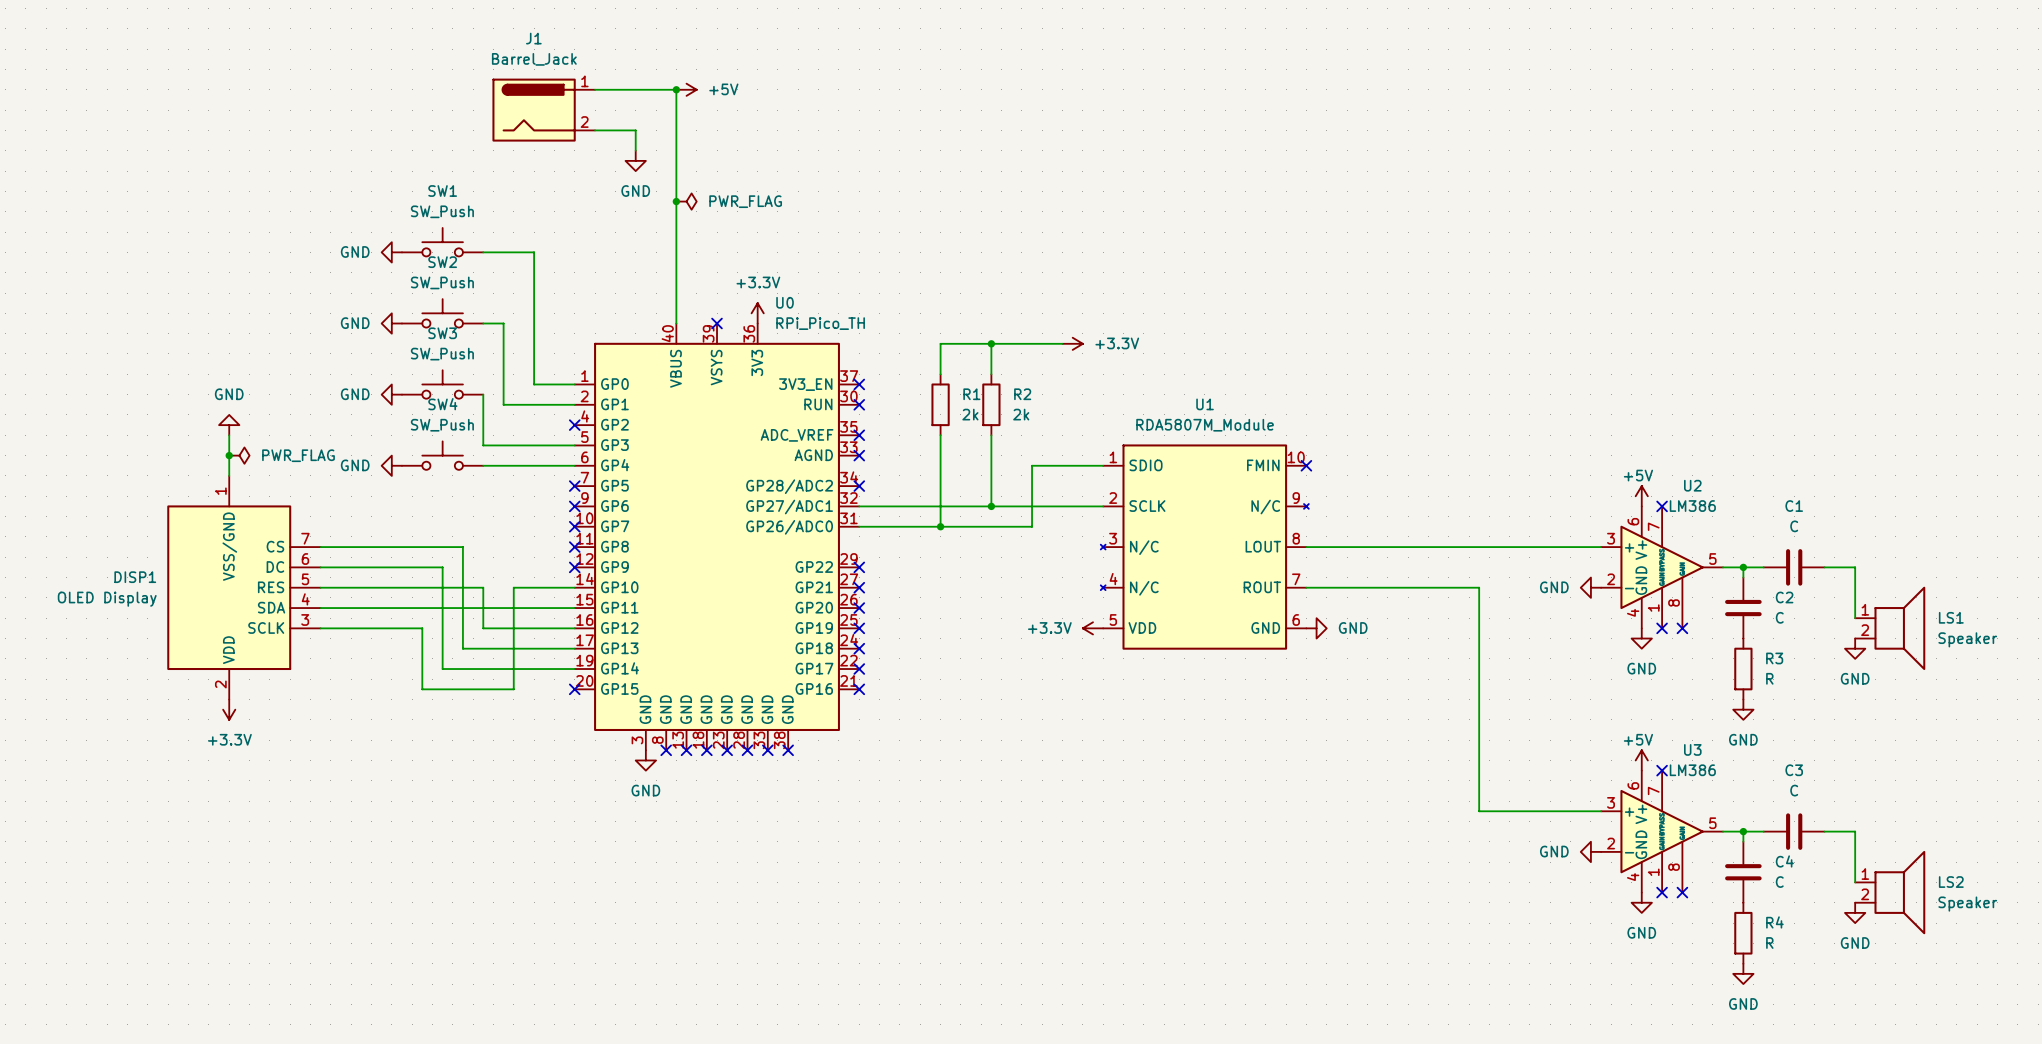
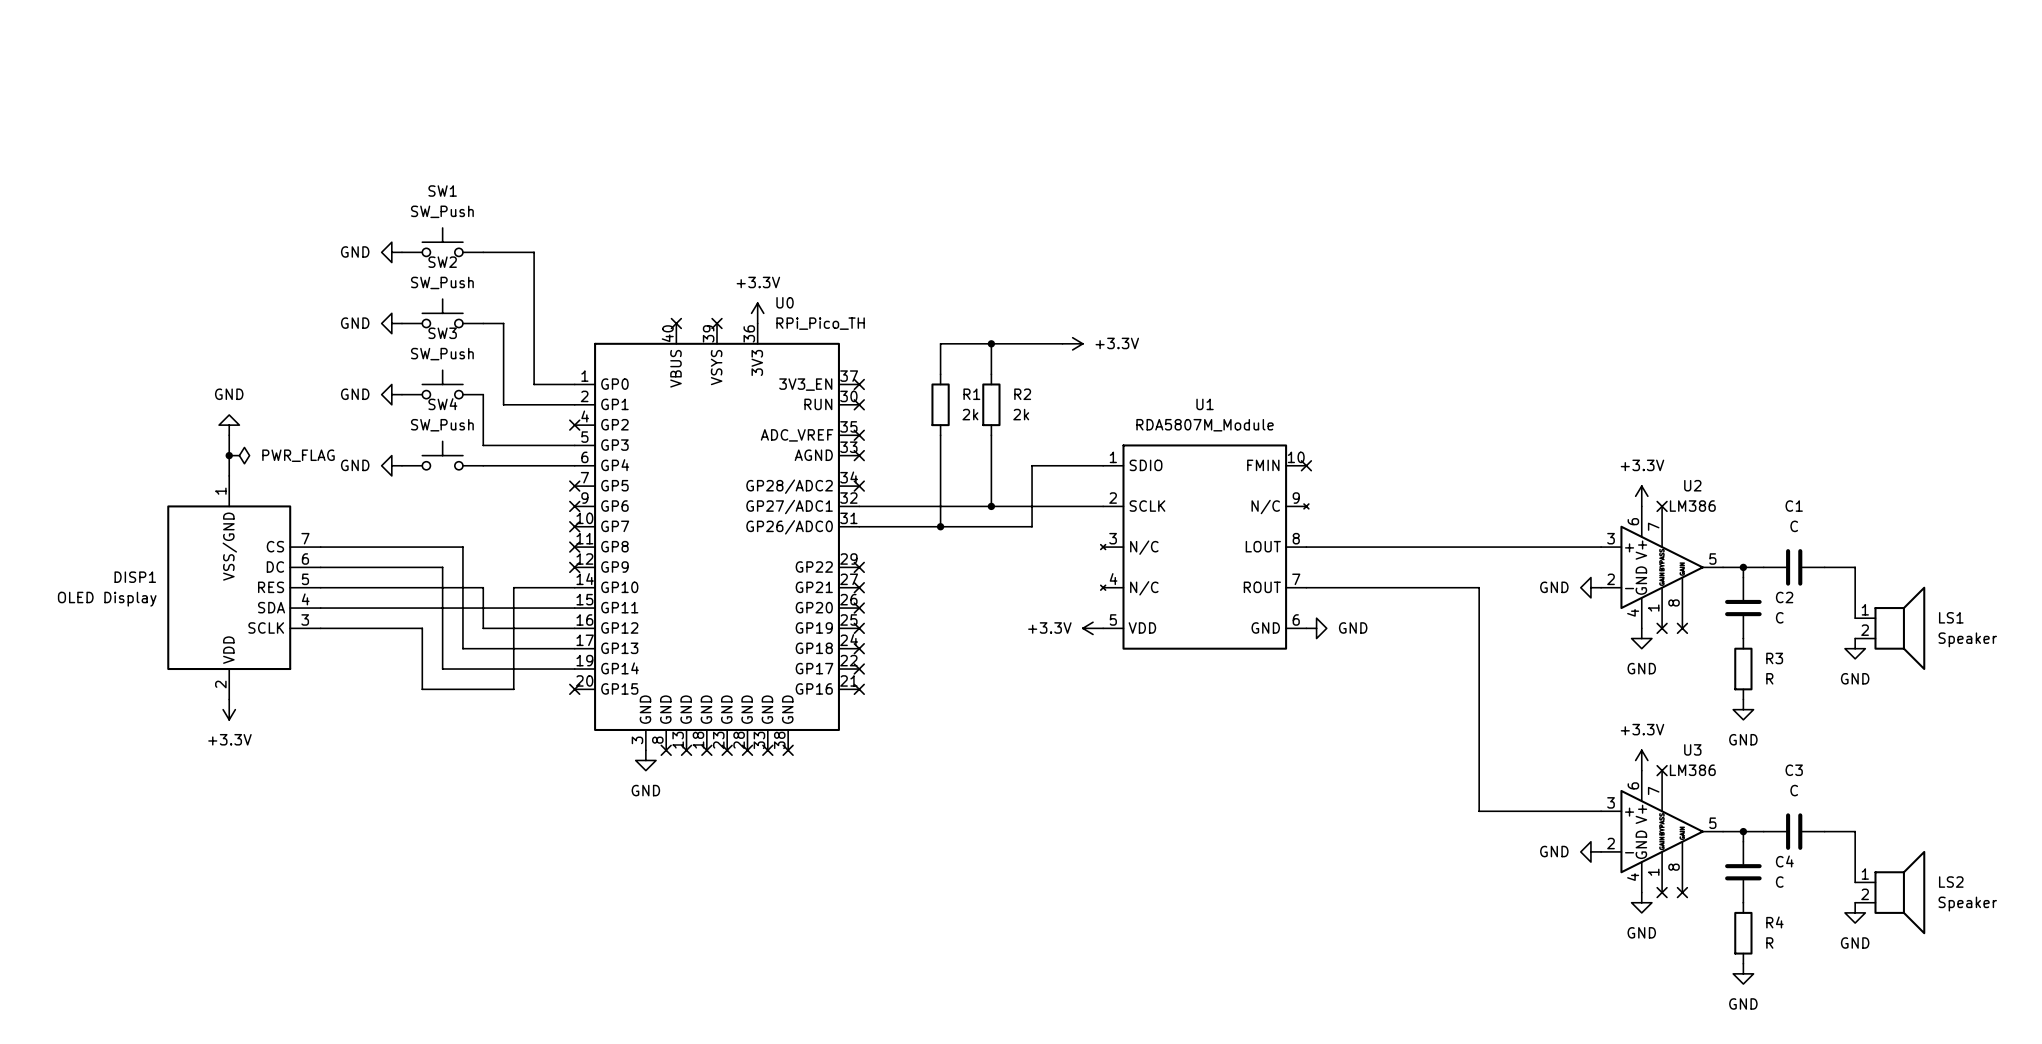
wire: (595, 89) (676, 89) (676, 323) -> none
junction: (676, 89) -> none
power symbol: +5V (686, 89) -> none
J1: Barrel_Jack (543, 110) -> none
wire: (595, 130) (635, 130) (635, 150) -> none
power symbol: GND (635, 160) -> none
junction: (676, 201) -> none
power symbol: PWR_FLAG (686, 201) -> none
no-connect mark: none -> (676, 323)
power symbol: +5V (1641, 496) -> +3.3V (1641, 496)
power symbol: +5V (1641, 760) -> +3.3V (1641, 760)

